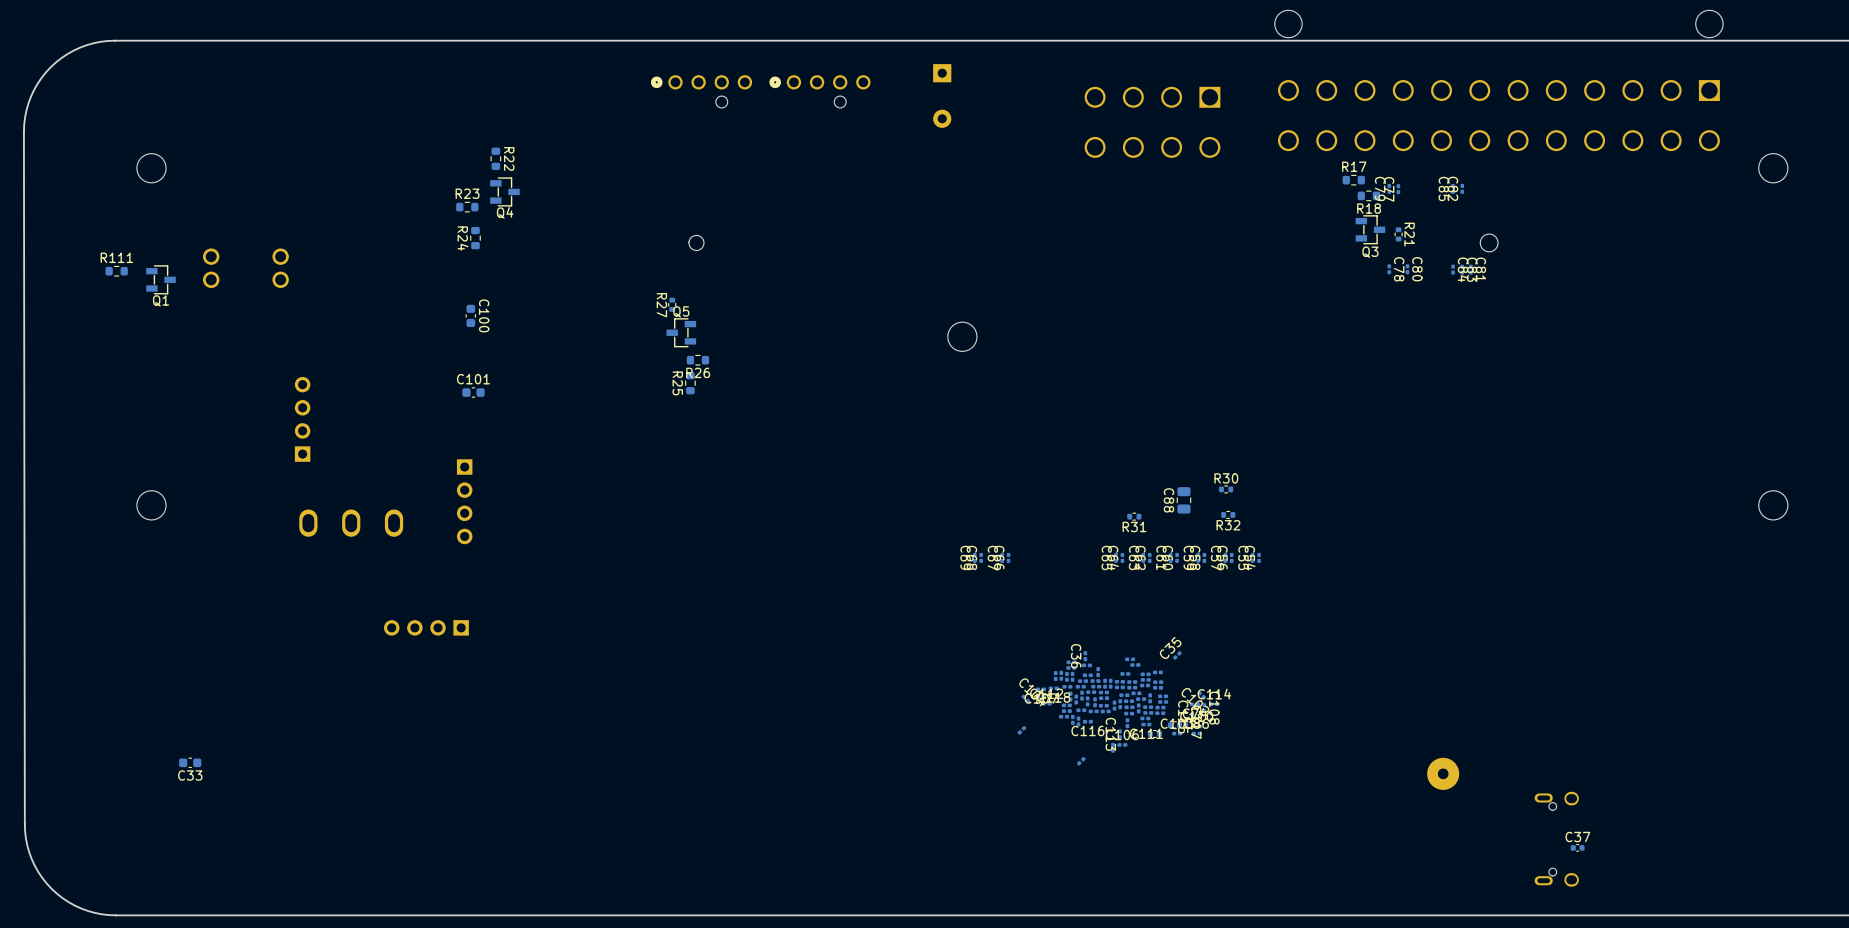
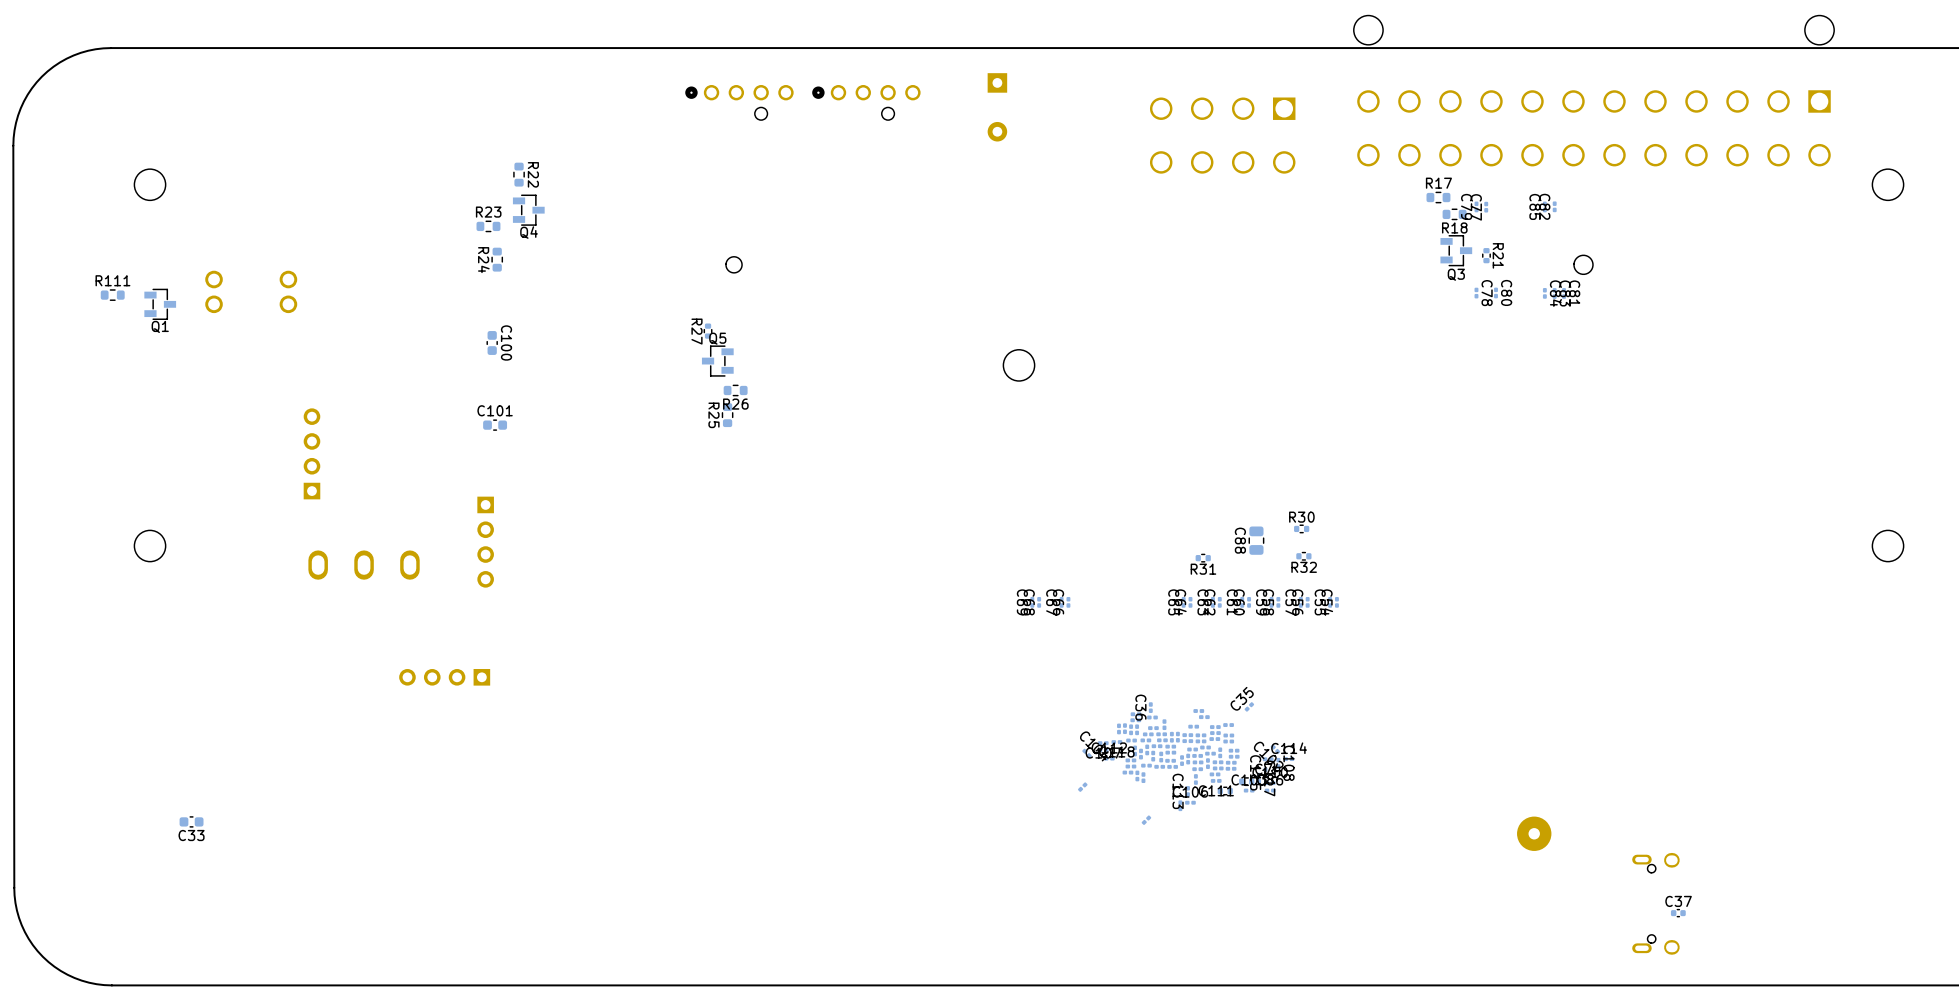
C116: (1087, 721) -> none

